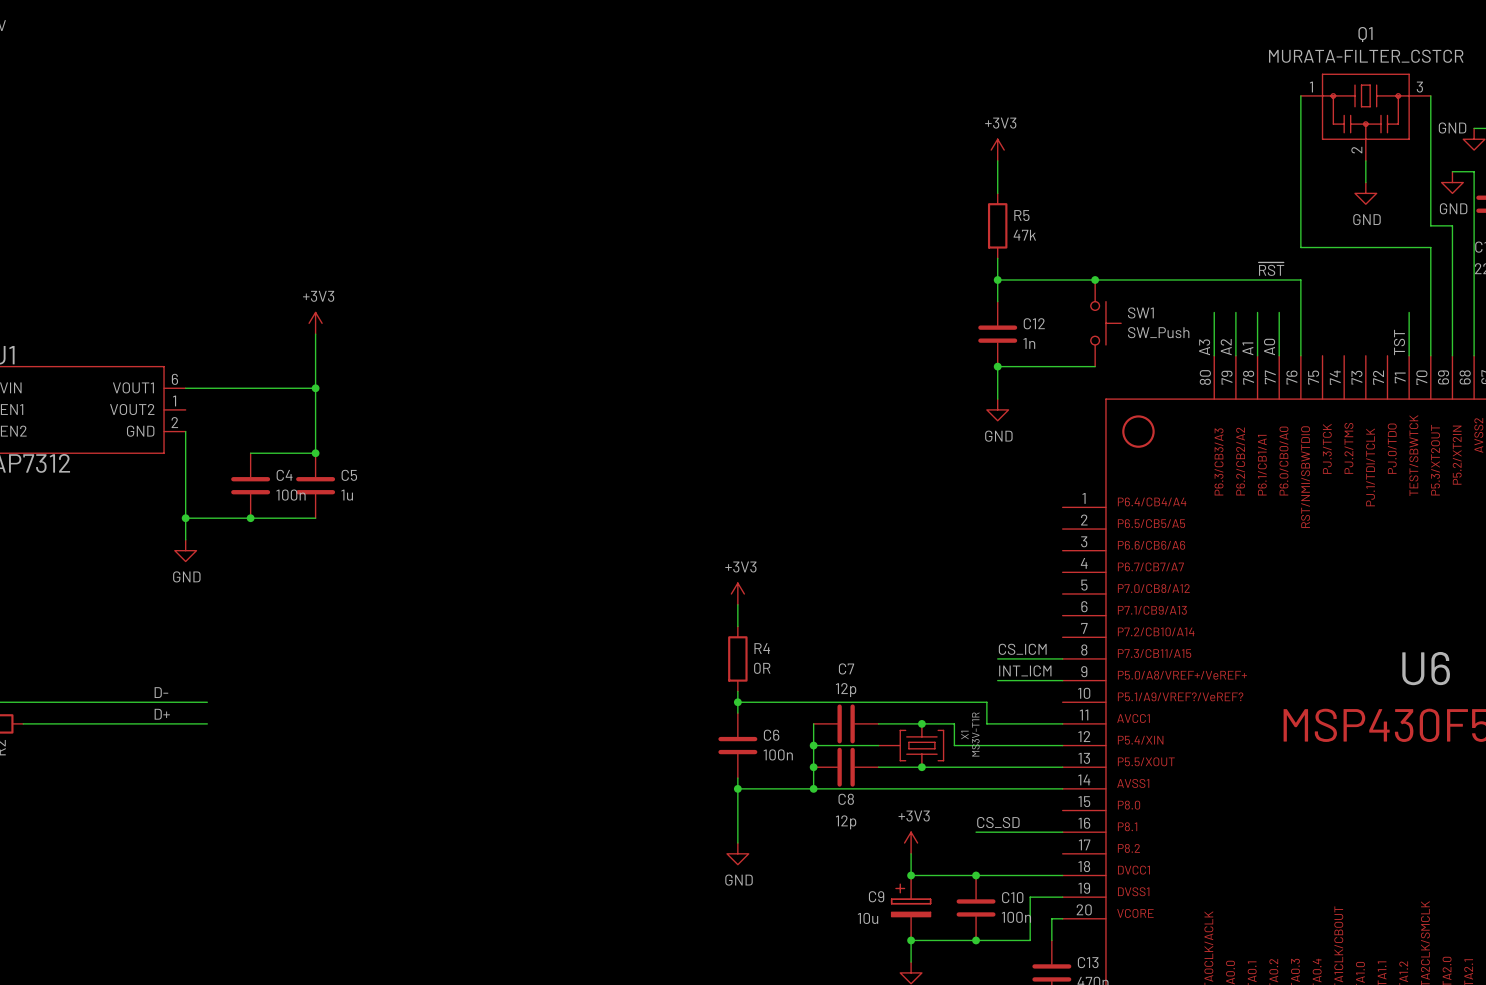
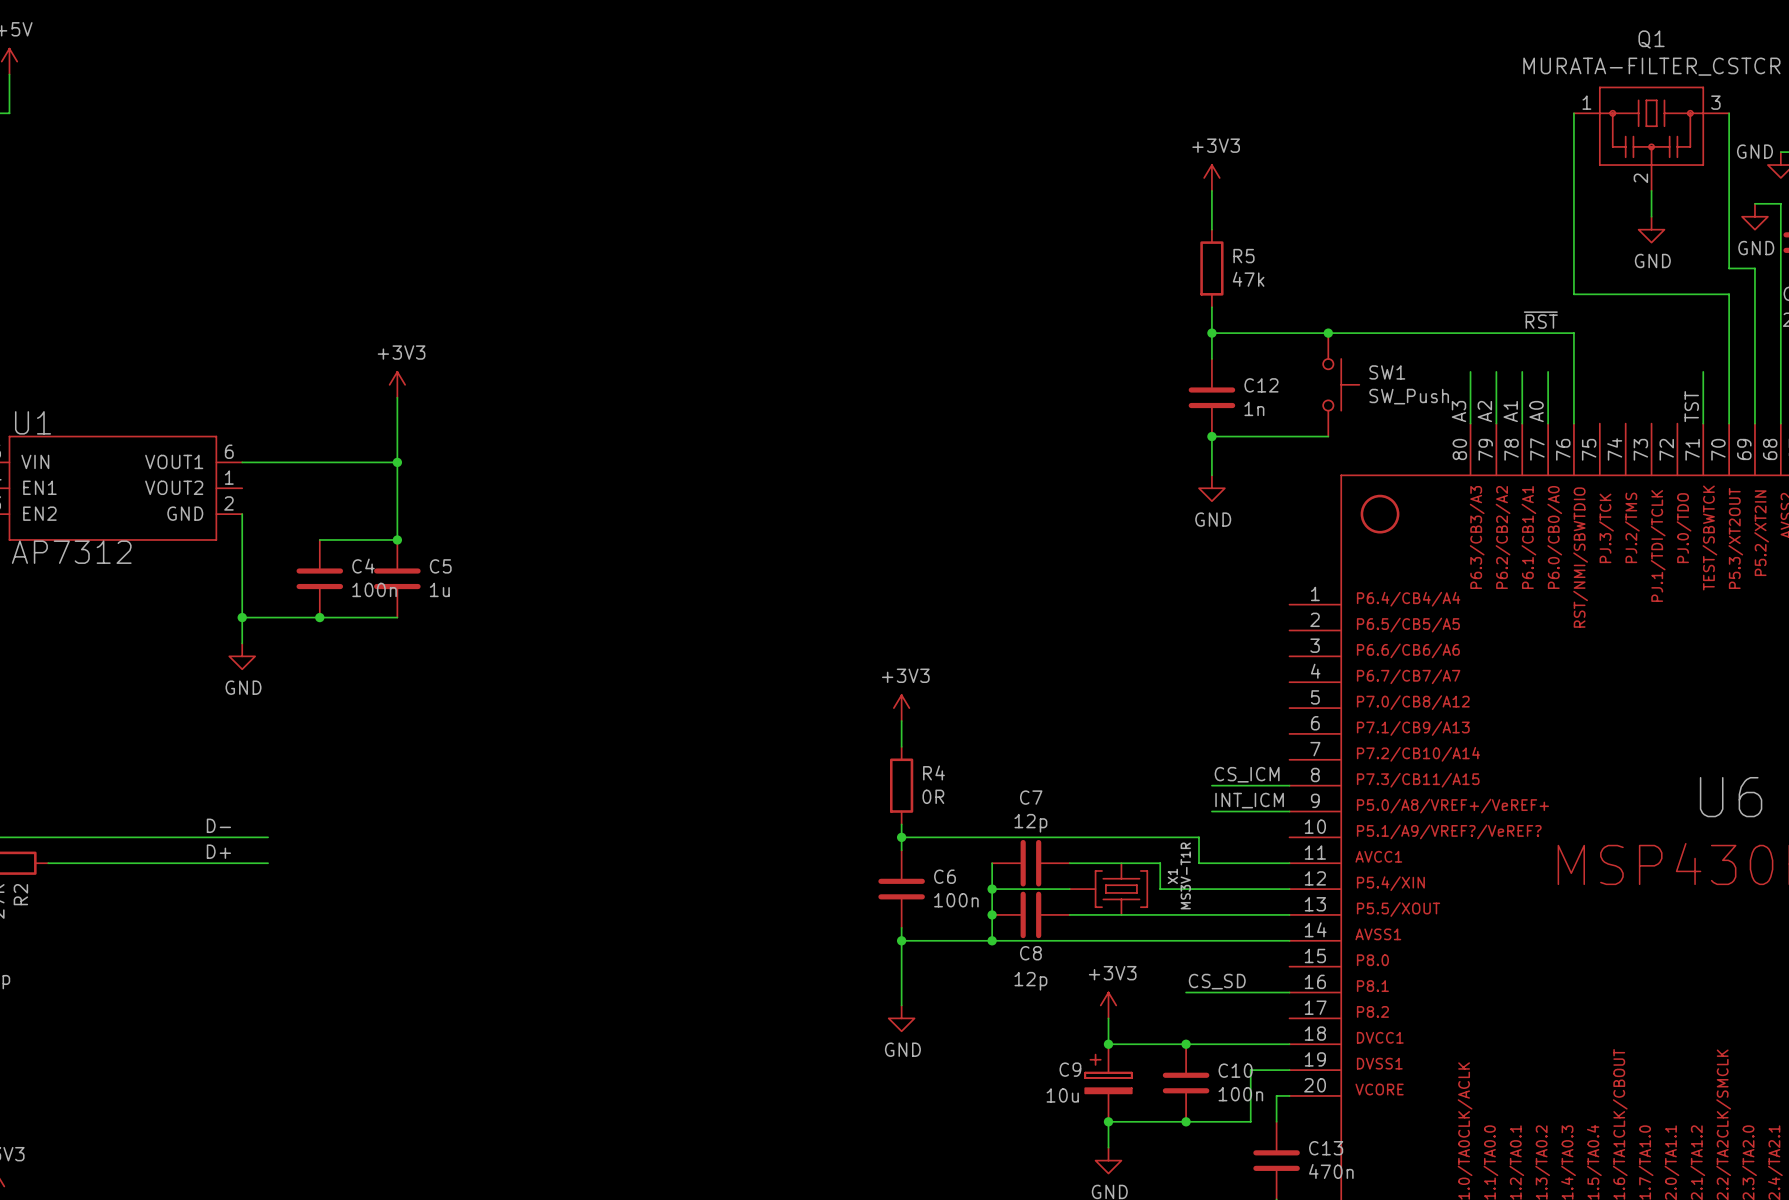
junction: (921, 723) -> none
junction: (921, 767) -> none

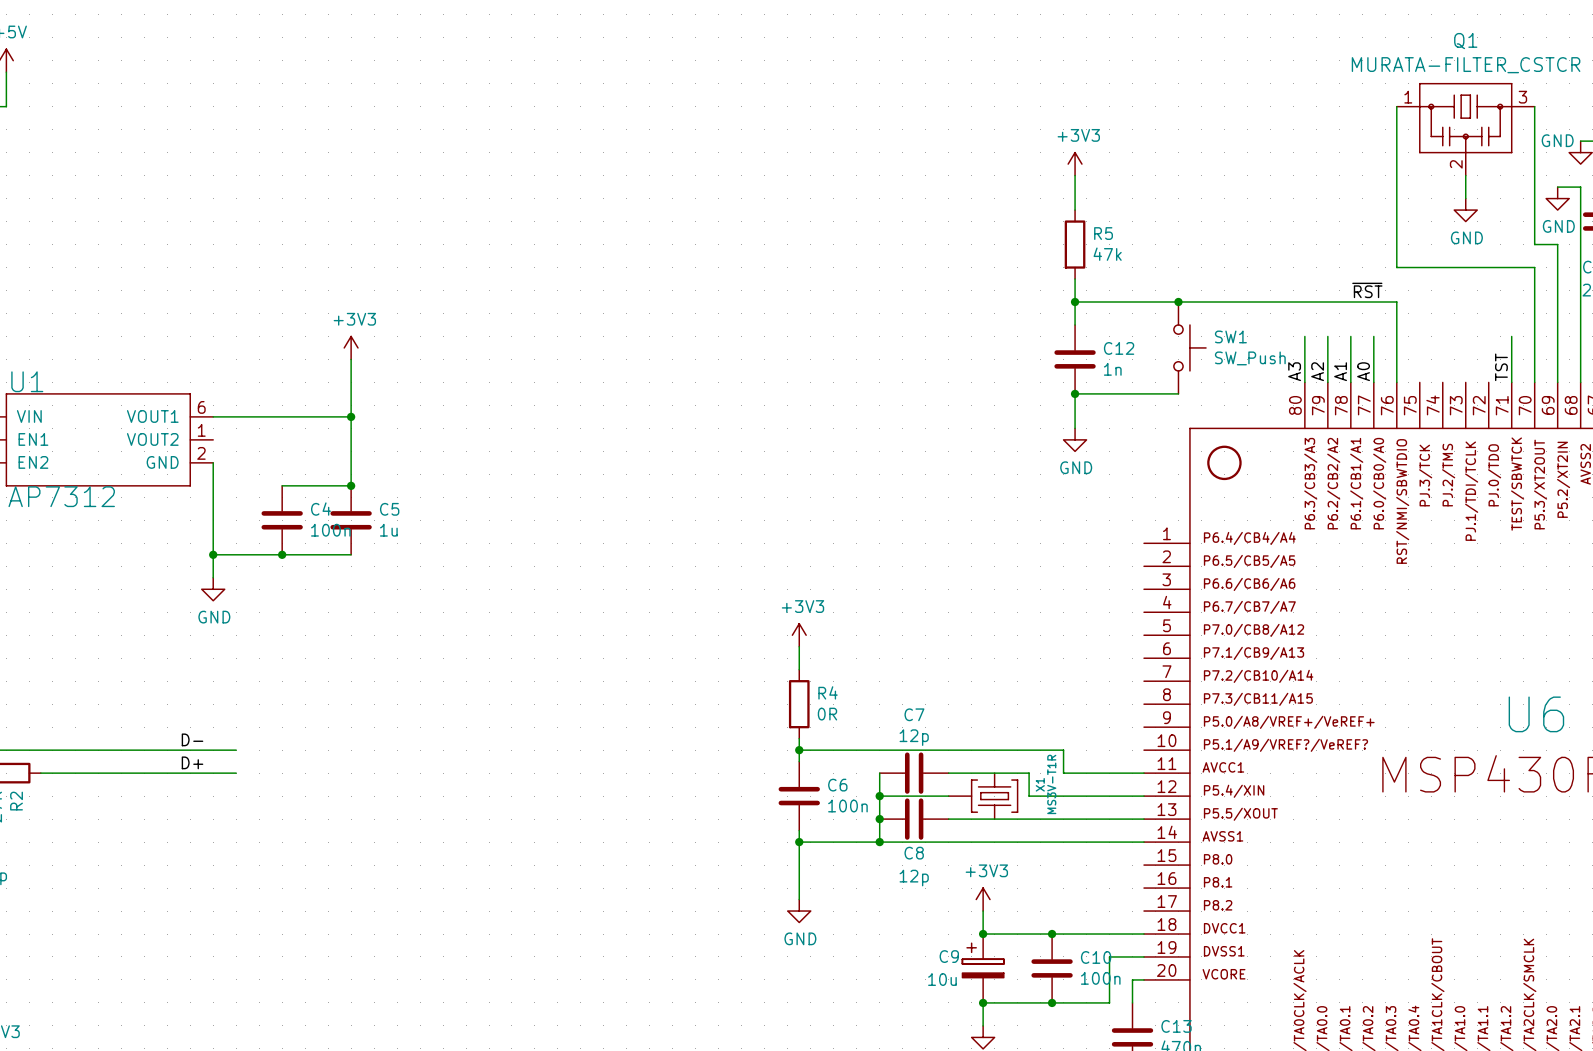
label: CS_ICM (1247, 774) -> none
wire: (1211, 785) (1289, 785) -> none
label: INT_ICM (1249, 800) -> none
wire: (1211, 811) (1289, 811) -> none
label: CS_SD (1217, 981) -> none
wire: (1186, 992) (1289, 992) -> none

